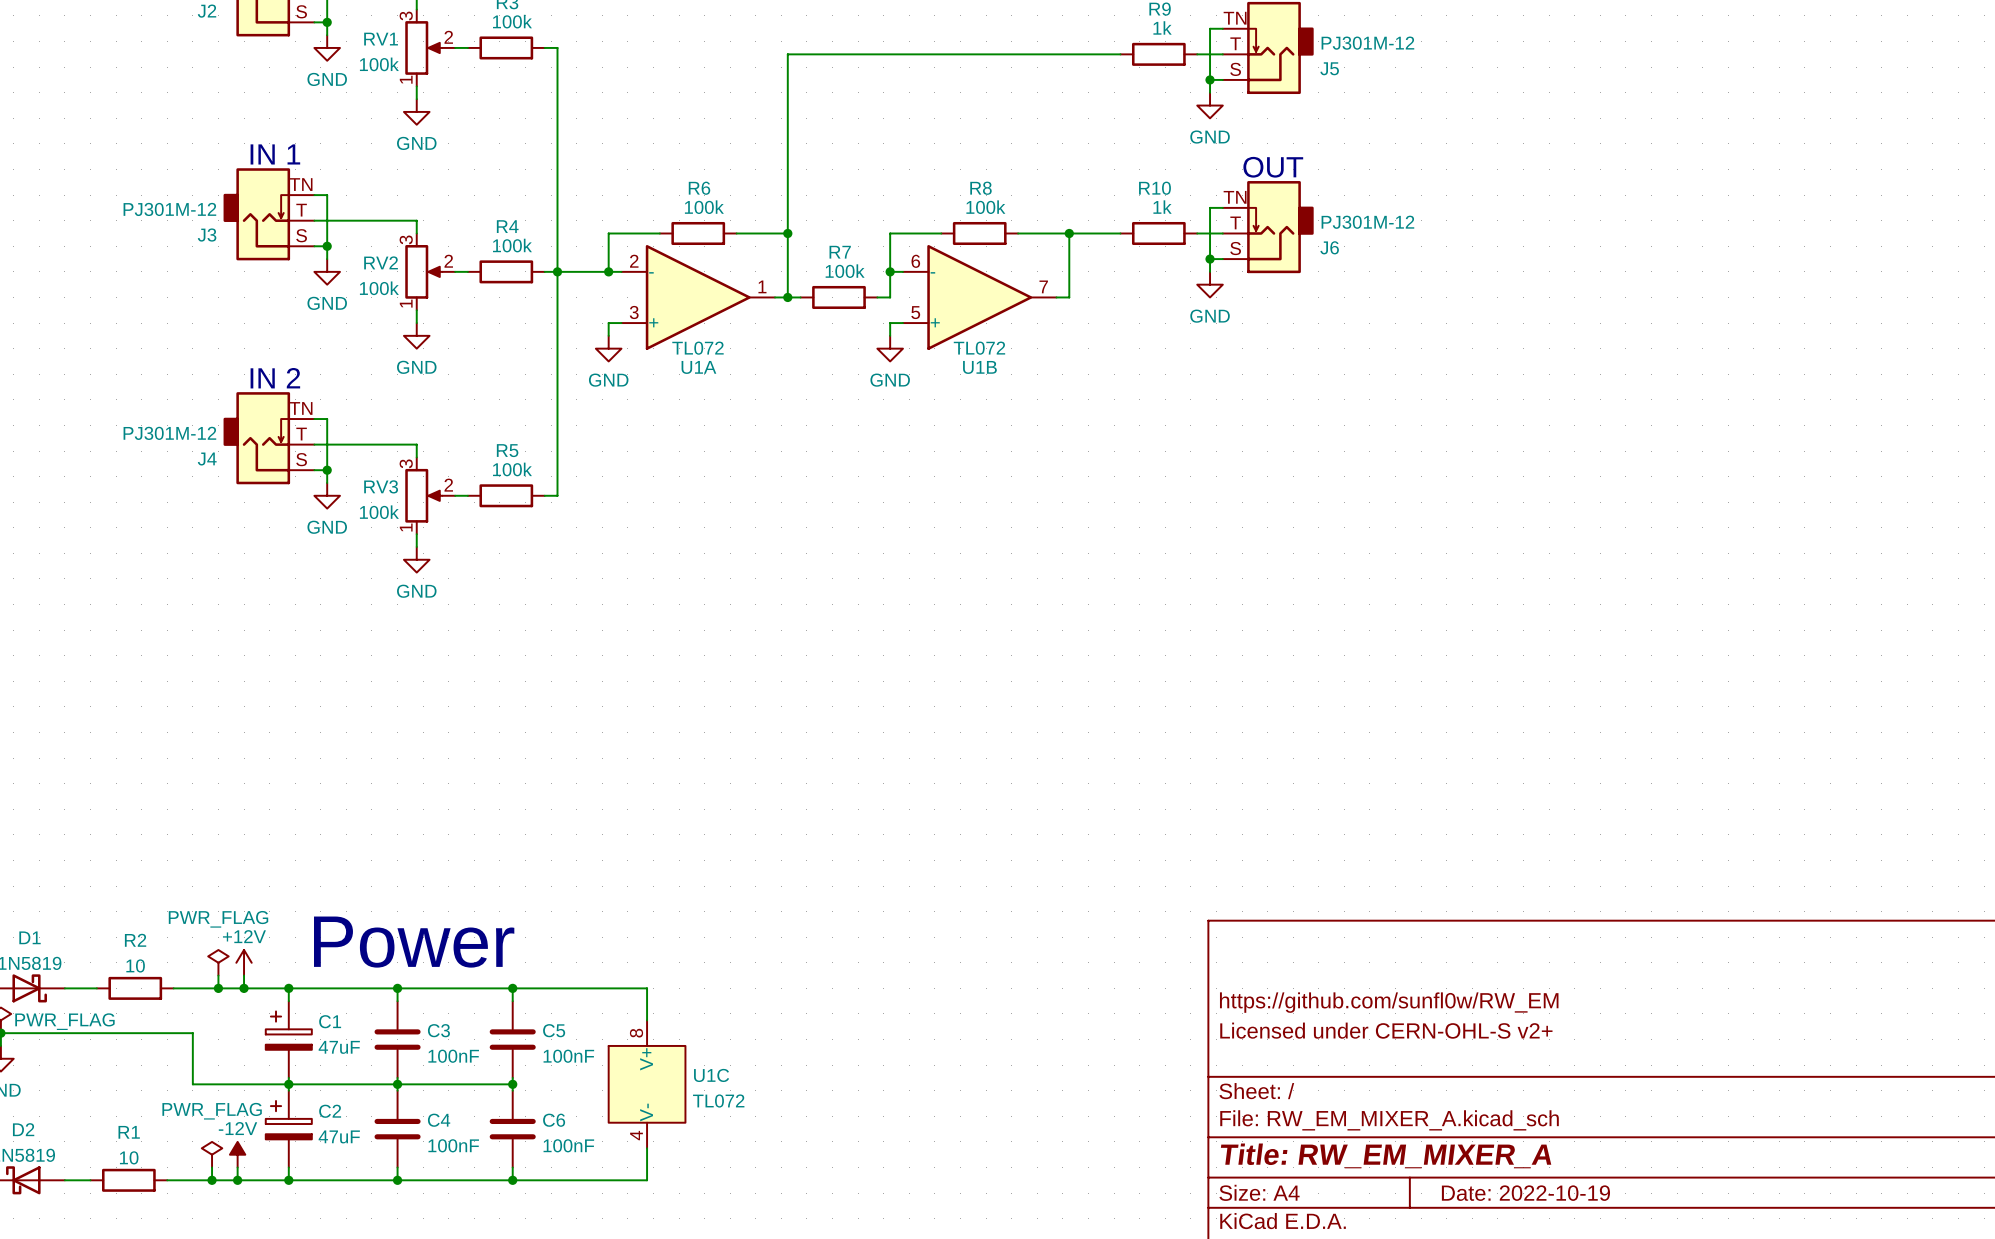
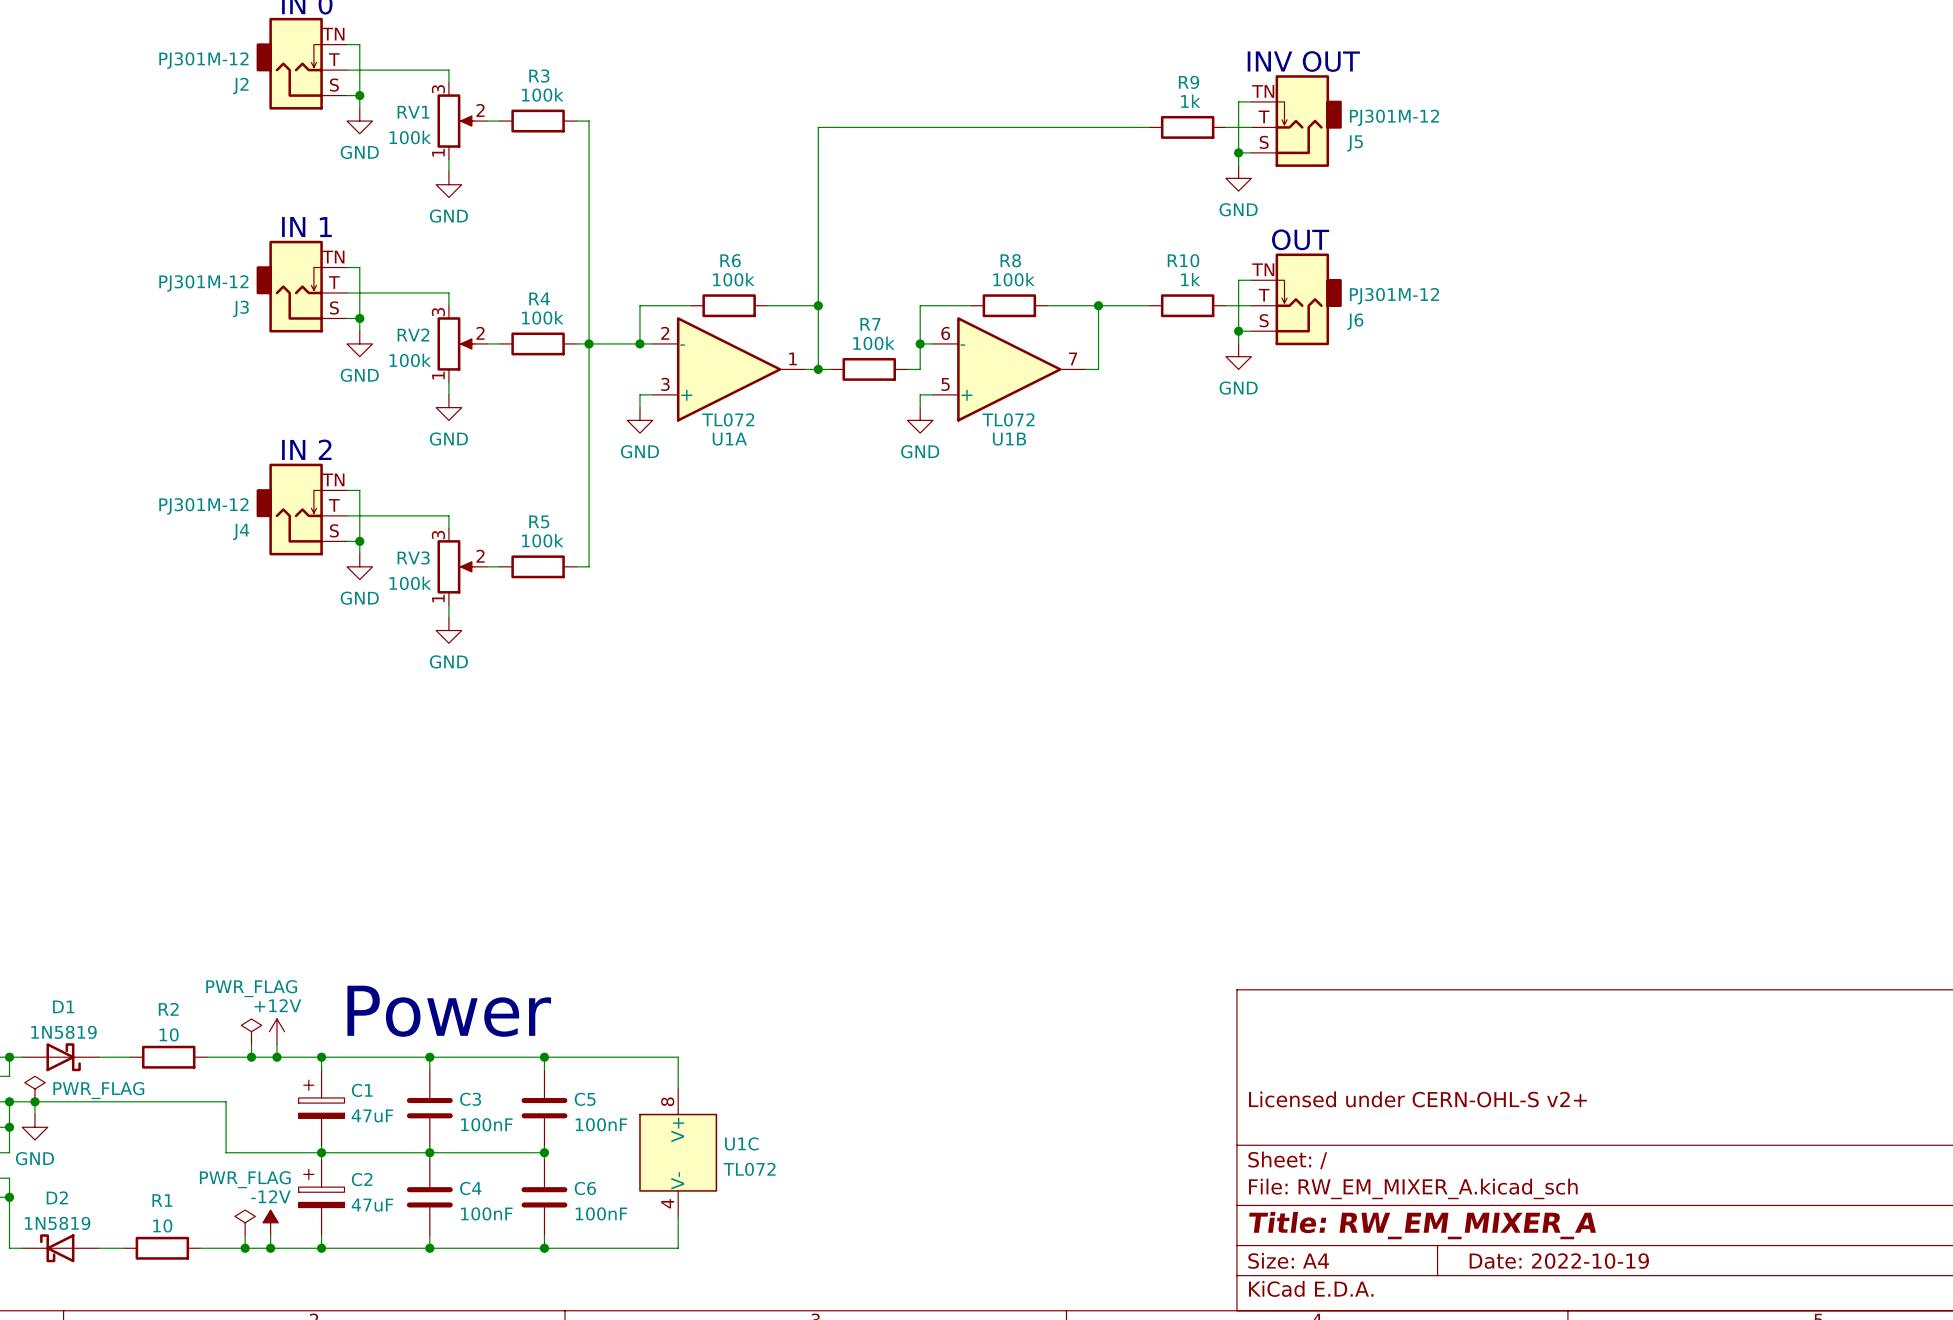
title block: https://github.com/sunfl0w/RW_EM (1389, 1002) -> none

